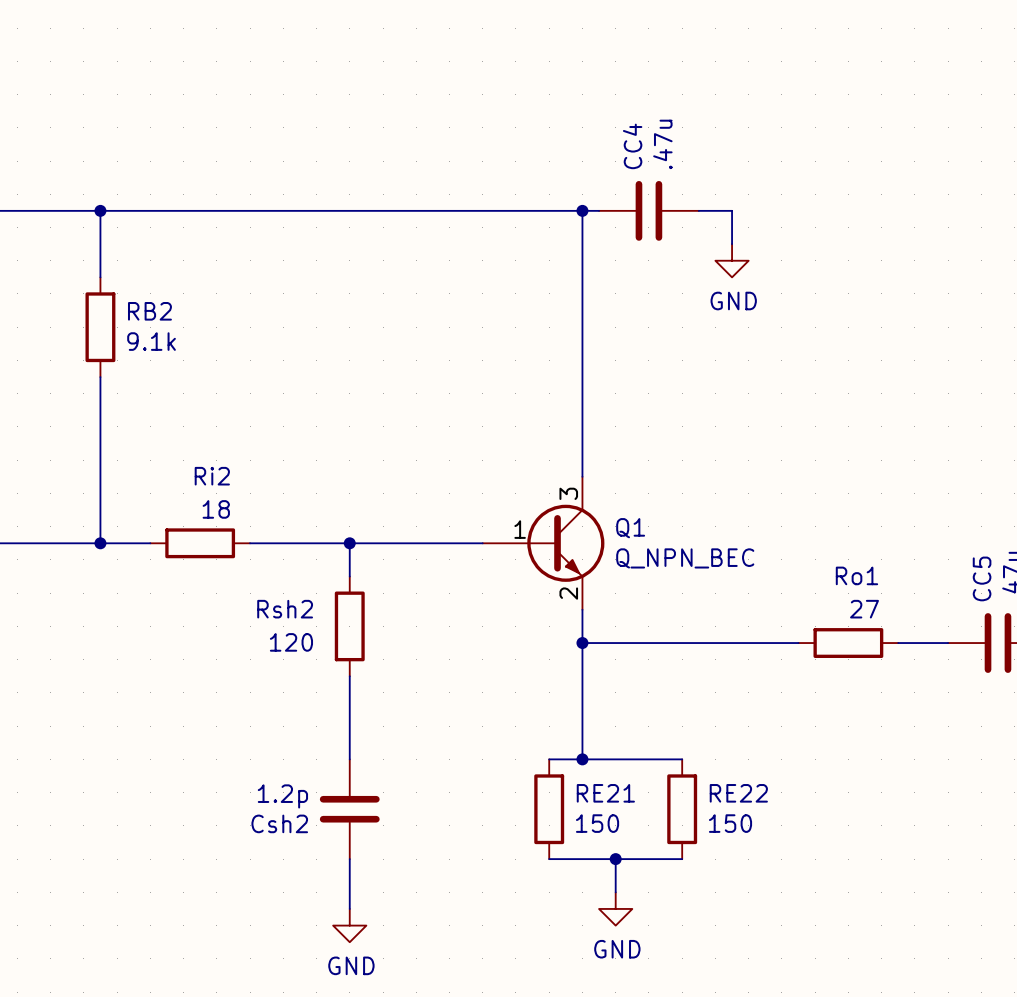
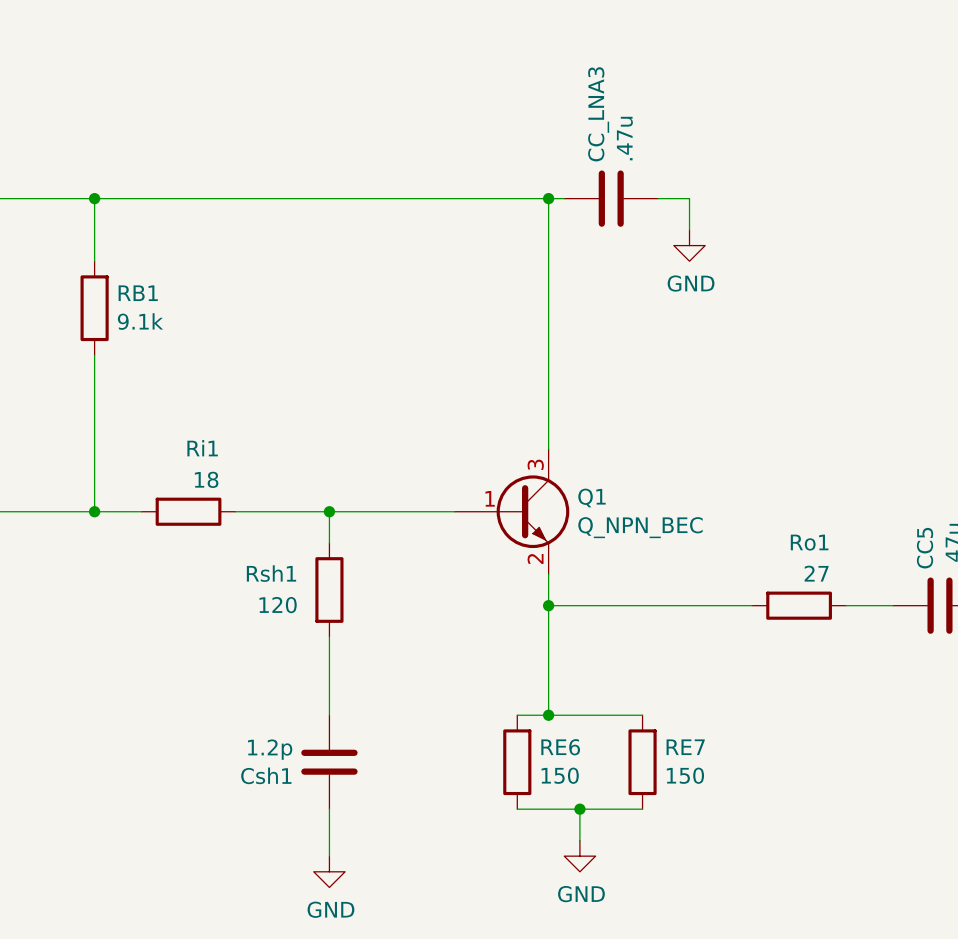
CC4 name: CC4 (632, 146) -> CC_LNA3 (598, 114)
RB2 name: RB2 (149, 311) -> RB1 (138, 293)
Ri2 name: Ri2 (212, 476) -> Ri1 (202, 448)
Rsh2 name: Rsh2 (285, 609) -> Rsh1 (271, 573)
RE21 name: RE21 (605, 793) -> RE6 (560, 747)
RE22 name: RE22 (738, 793) -> RE7 (685, 747)
Csh2 name: Csh2 (279, 823) -> Csh1 (266, 775)

